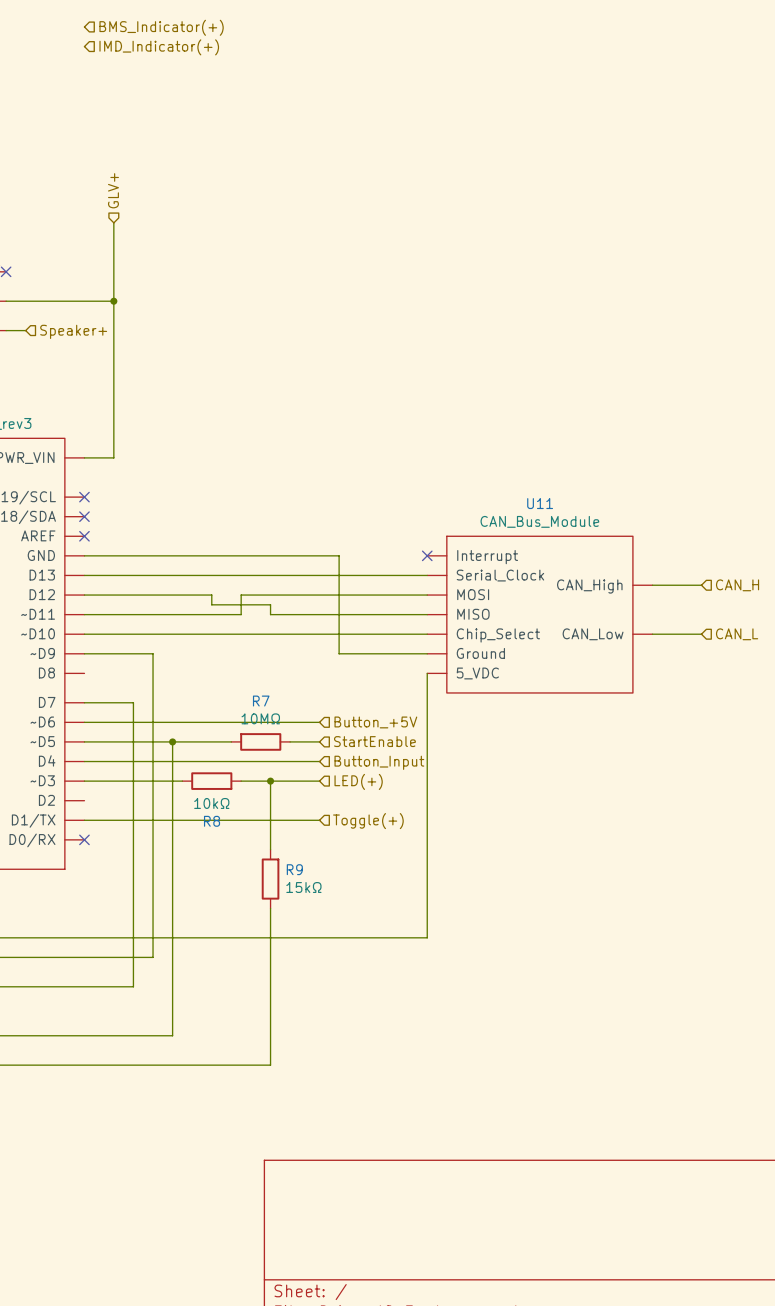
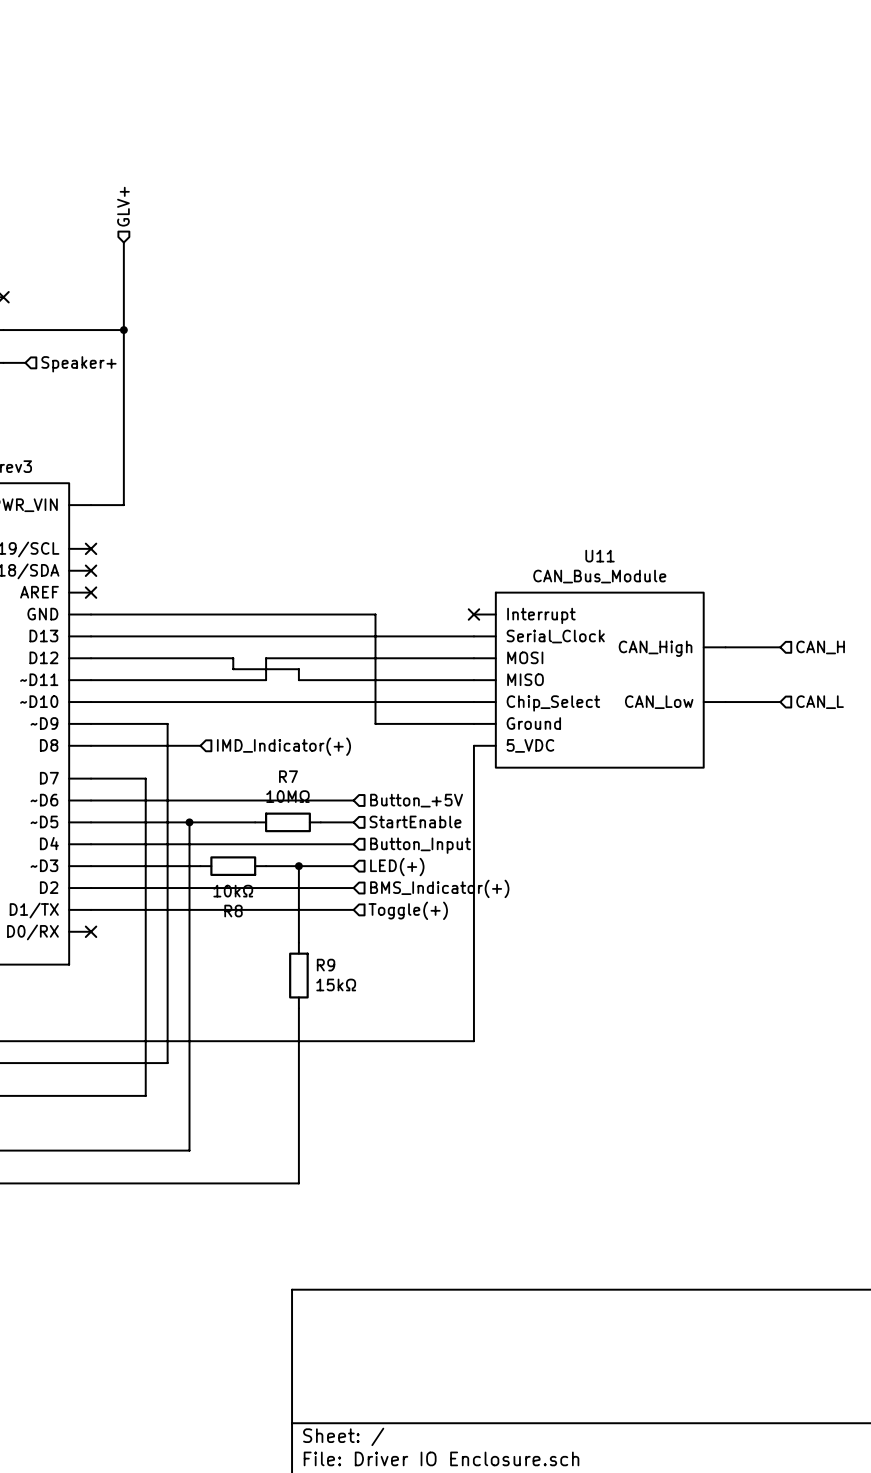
hierarchical label: BMS_Indicator(+) (161, 27) -> none
hierarchical label: IMD_Indicator(+) (159, 47) -> none
wire: none -> (91, 745) (200, 745)
hierarchical label: none -> IMD_Indicator(+) (283, 746)
wire: none -> (91, 888) (353, 888)
hierarchical label: none -> BMS_Indicator(+) (439, 888)

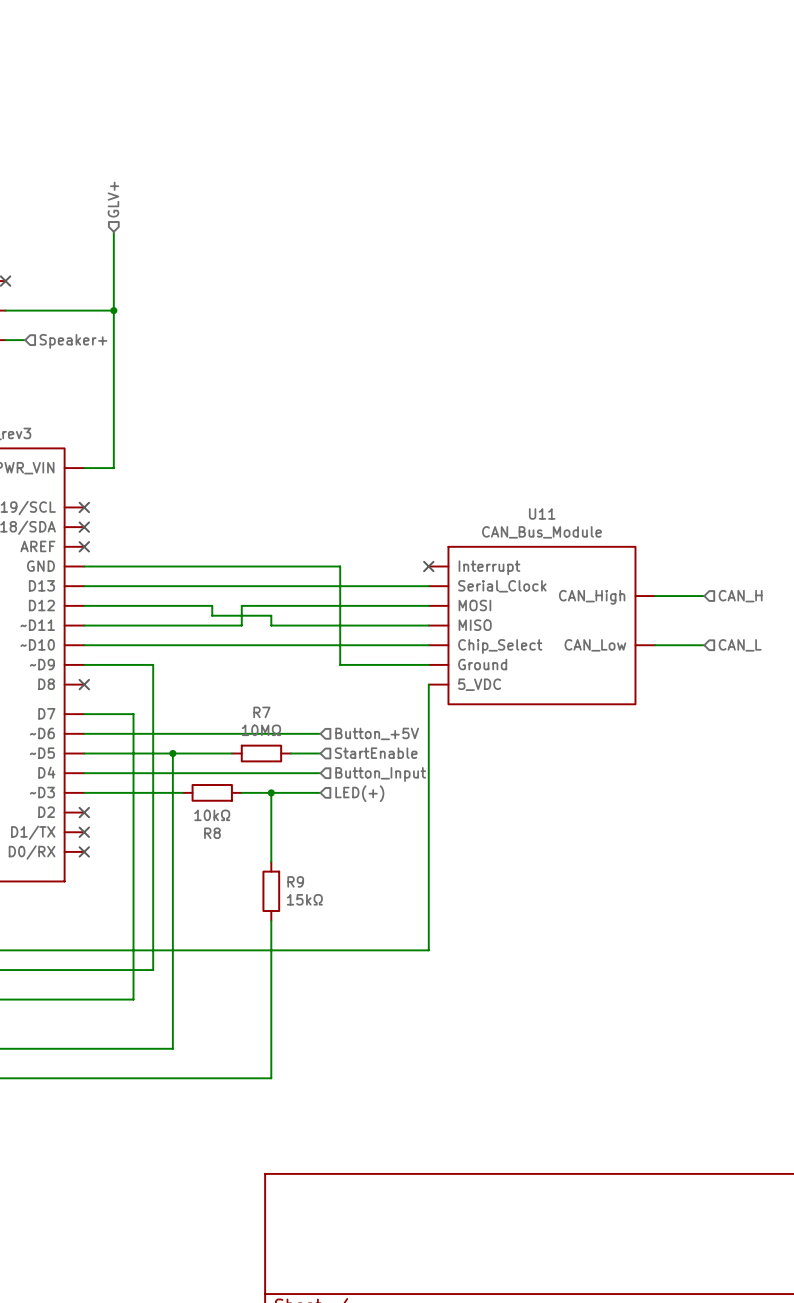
wire: (91, 745) (200, 745) -> none
no-connect mark: none -> (84, 684)
hierarchical label: IMD_Indicator(+) (283, 746) -> none
wire: (91, 888) (353, 888) -> none
no-connect mark: none -> (84, 812)
hierarchical label: BMS_Indicator(+) (439, 888) -> none
wire: (91, 909) (353, 909) -> none
no-connect mark: none -> (84, 832)
hierarchical label: Toggle(+) (408, 910) -> none

